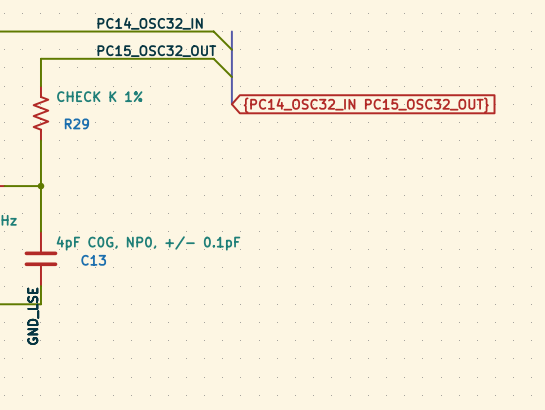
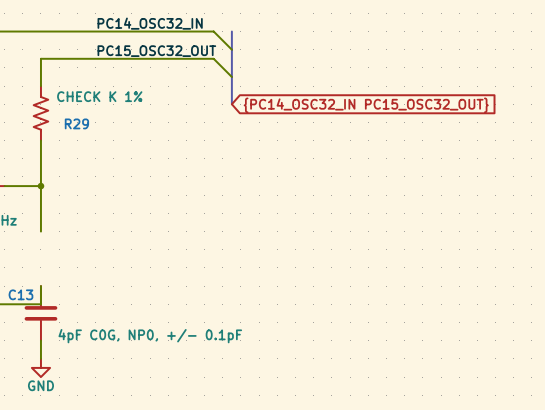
C13 value position: 4pF C0G, NP0, +/- 0.1pF (148, 243) -> 4pF C0G, NP0, +/- 0.1pF (150, 336)
C13 position: (40, 258) -> (40, 313)
C13 name position: C13 (93, 260) -> C13 (20, 294)
label: GND_LSE (33, 316) -> none
wire: none -> (40, 340) (40, 358)
power symbol: none -> GND (40, 367)

